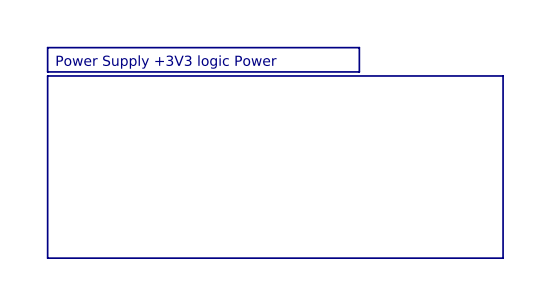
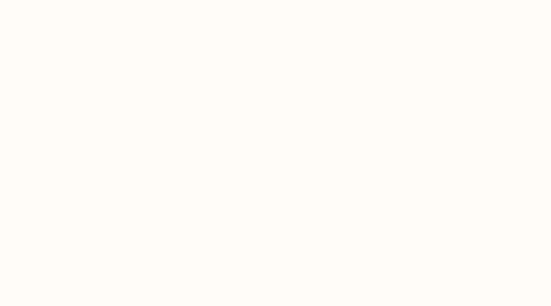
line: (47, 47) (47, 71) (359, 71) (359, 47) (47, 47) -> none
text: Power Supply +3V3 logic Power (166, 62) -> none
line: (47, 75) (503, 75) (503, 258) (47, 258) (47, 75) -> none

